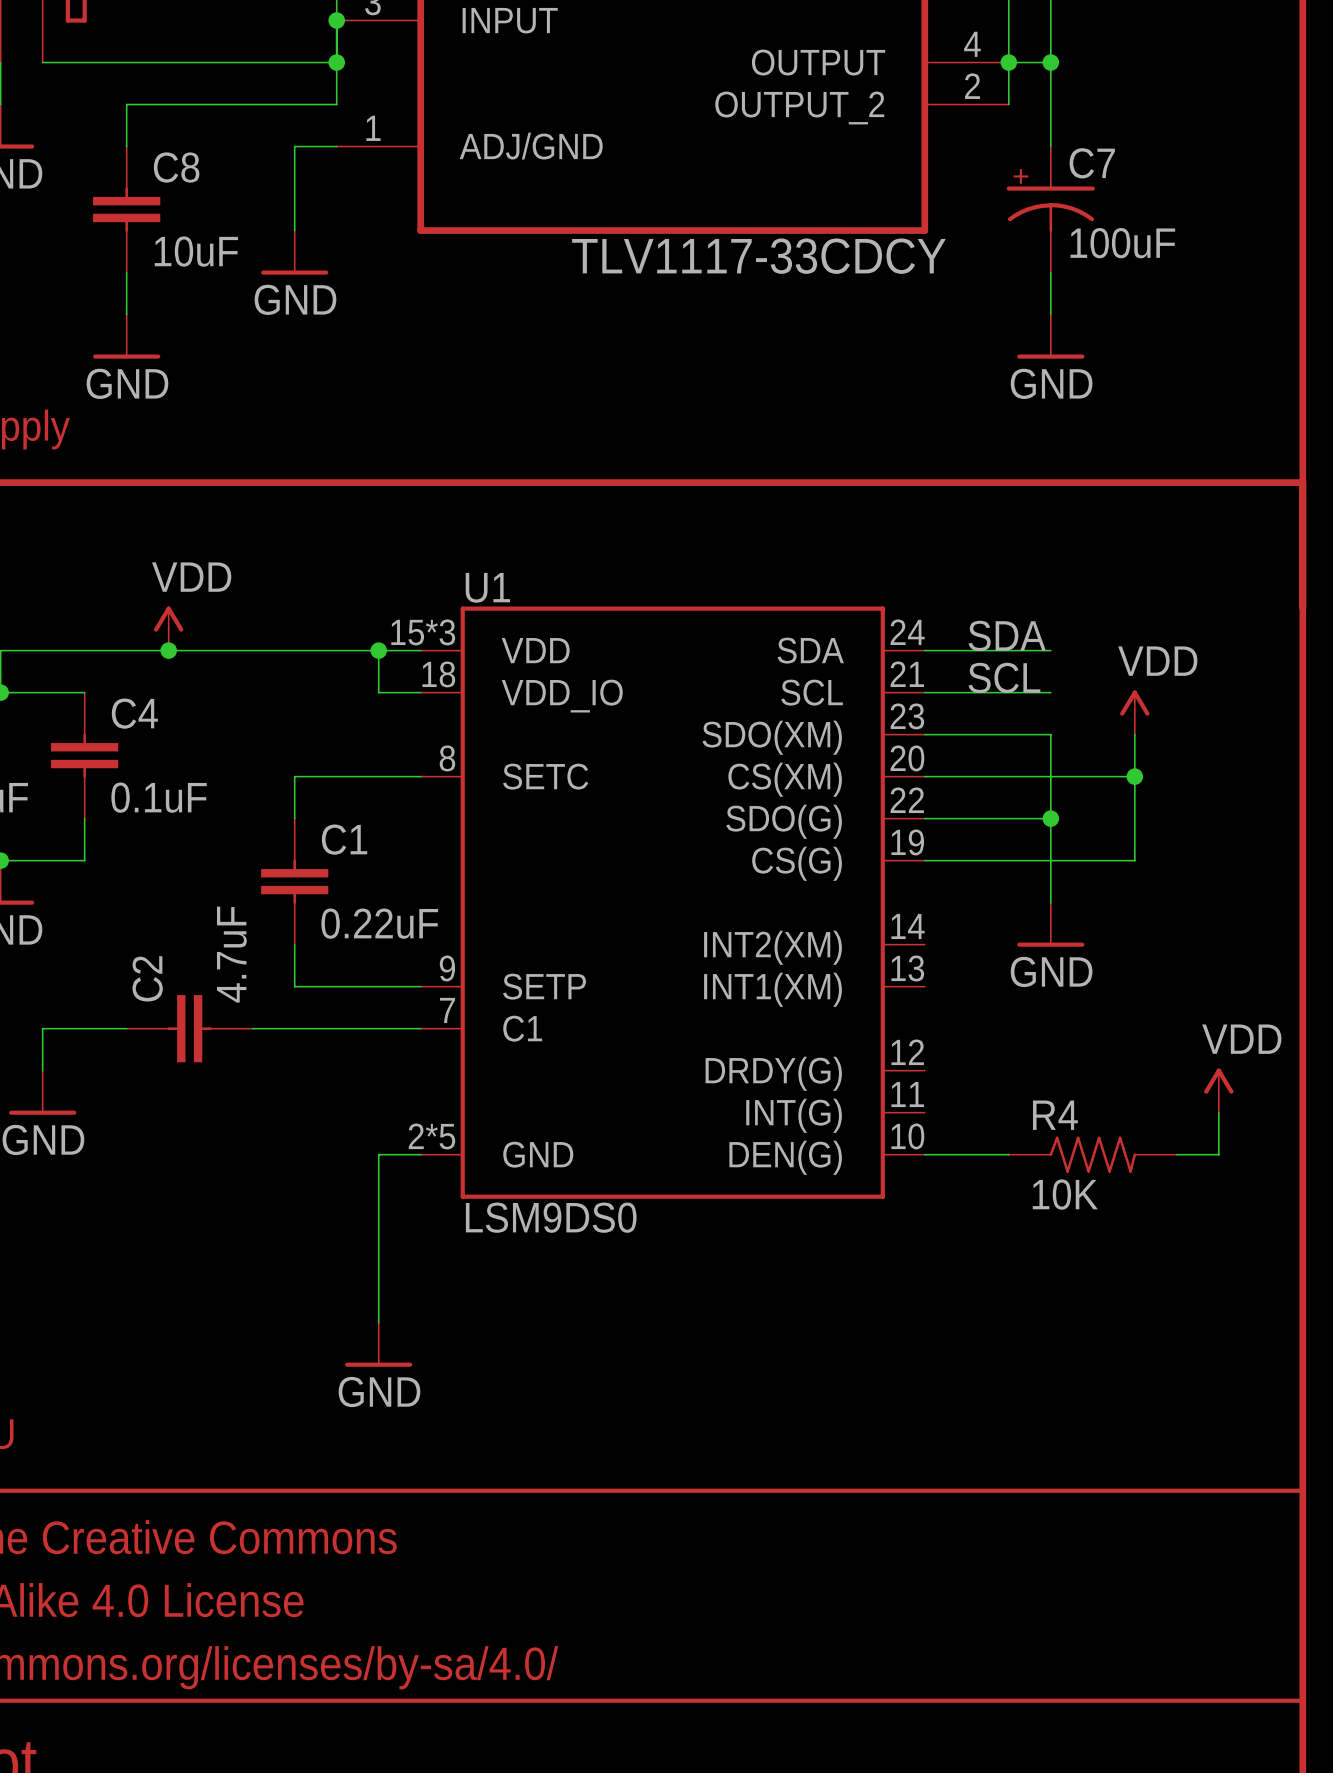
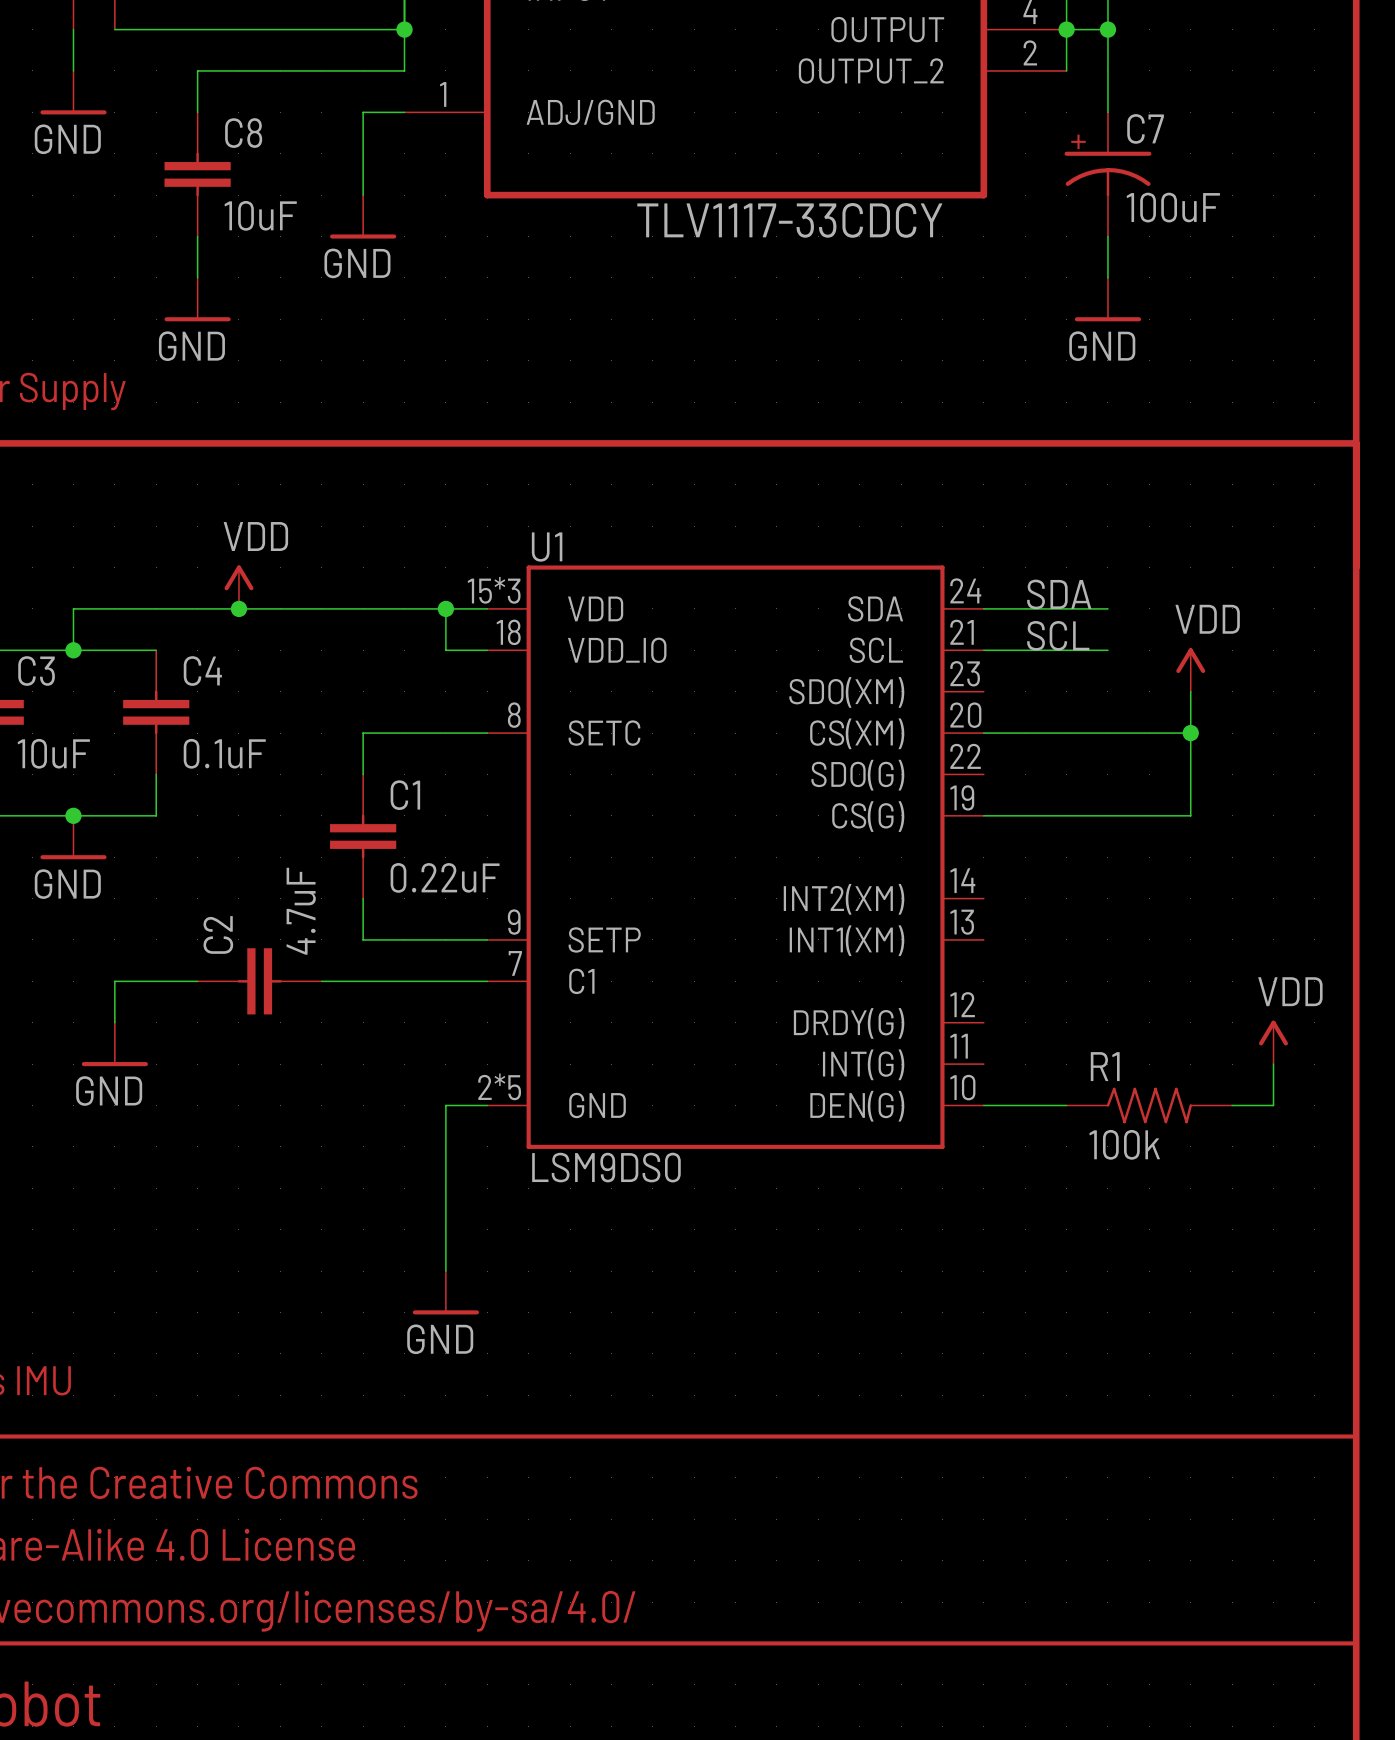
wire: (924, 734) (1050, 734) (1050, 902) -> none
wire: (924, 818) (1050, 818) -> none
junction: (1050, 818) -> none
power symbol: GND (1050, 924) -> none
R4 name: R4 (1055, 1115) -> R1 (1105, 1066)
R4 value: 10K (1065, 1194) -> 100k (1124, 1144)

